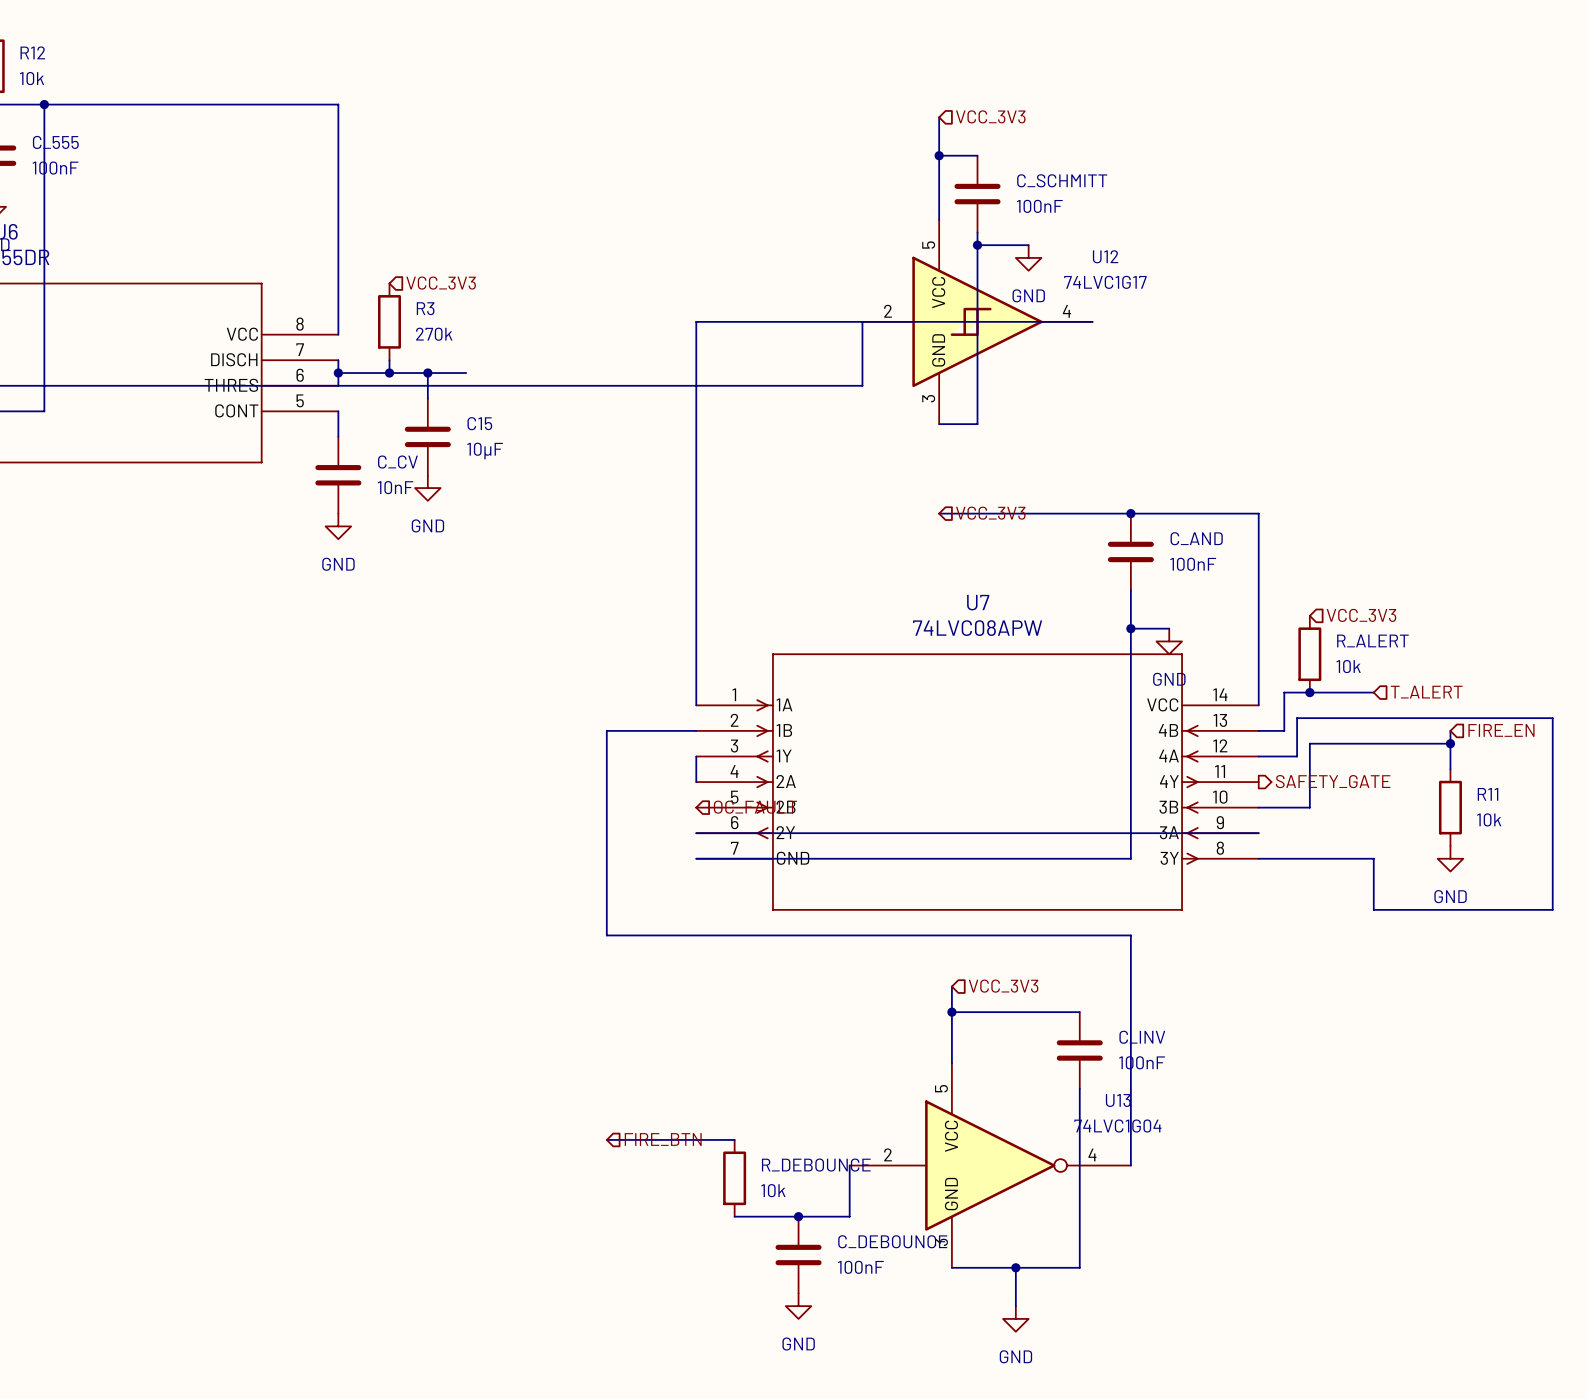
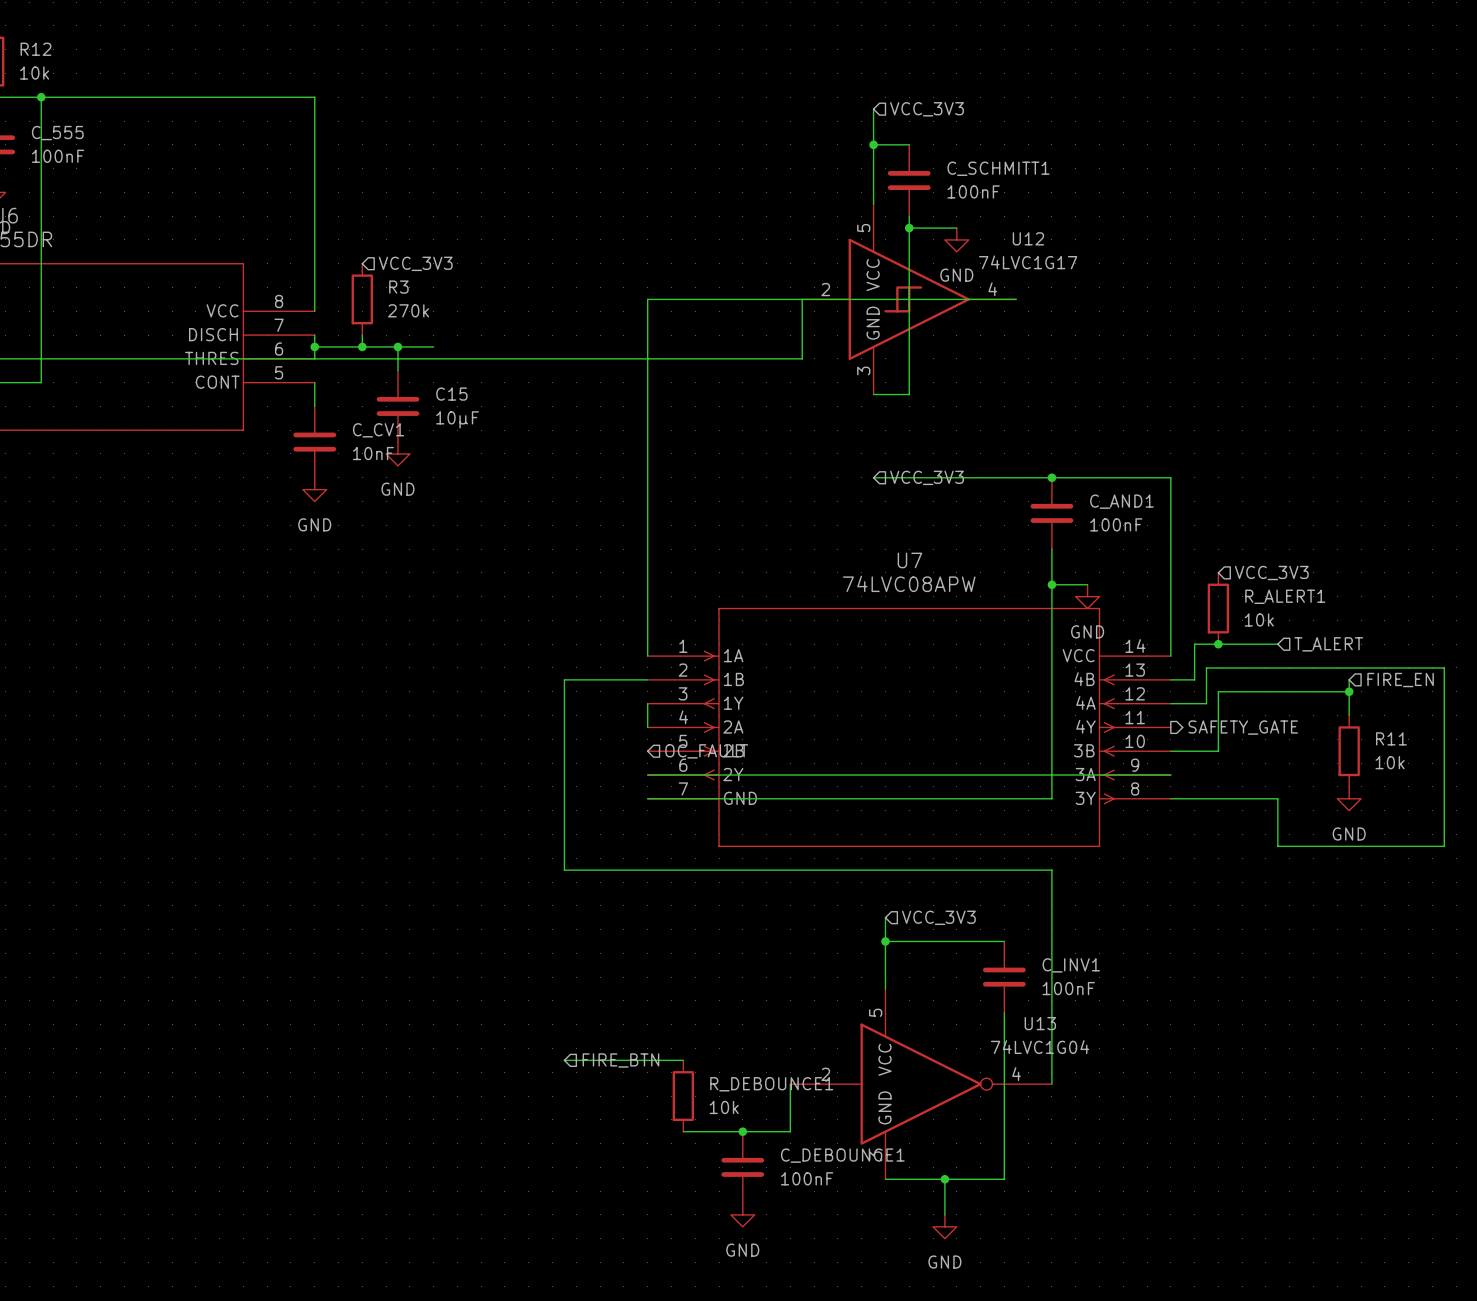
C_SCHMITT name: C_SCHMITT (1062, 180) -> C_SCHMITT1 (998, 168)
C_CV name: C_CV (397, 462) -> C_CV1 (378, 430)
C_AND name: C_AND (1196, 538) -> C_AND1 (1121, 501)
R_ALERT name: R_ALERT (1372, 640) -> R_ALERT1 (1285, 596)
C_INV name: C_INV (1142, 1037) -> C_INV1 (1071, 965)
R_DEBOUNCE name: R_DEBOUNCE (816, 1165) -> R_DEBOUNCE1 (771, 1084)
C_DEBOUNCE name: C_DEBOUNCE (892, 1241) -> C_DEBOUNCE1 (842, 1155)

